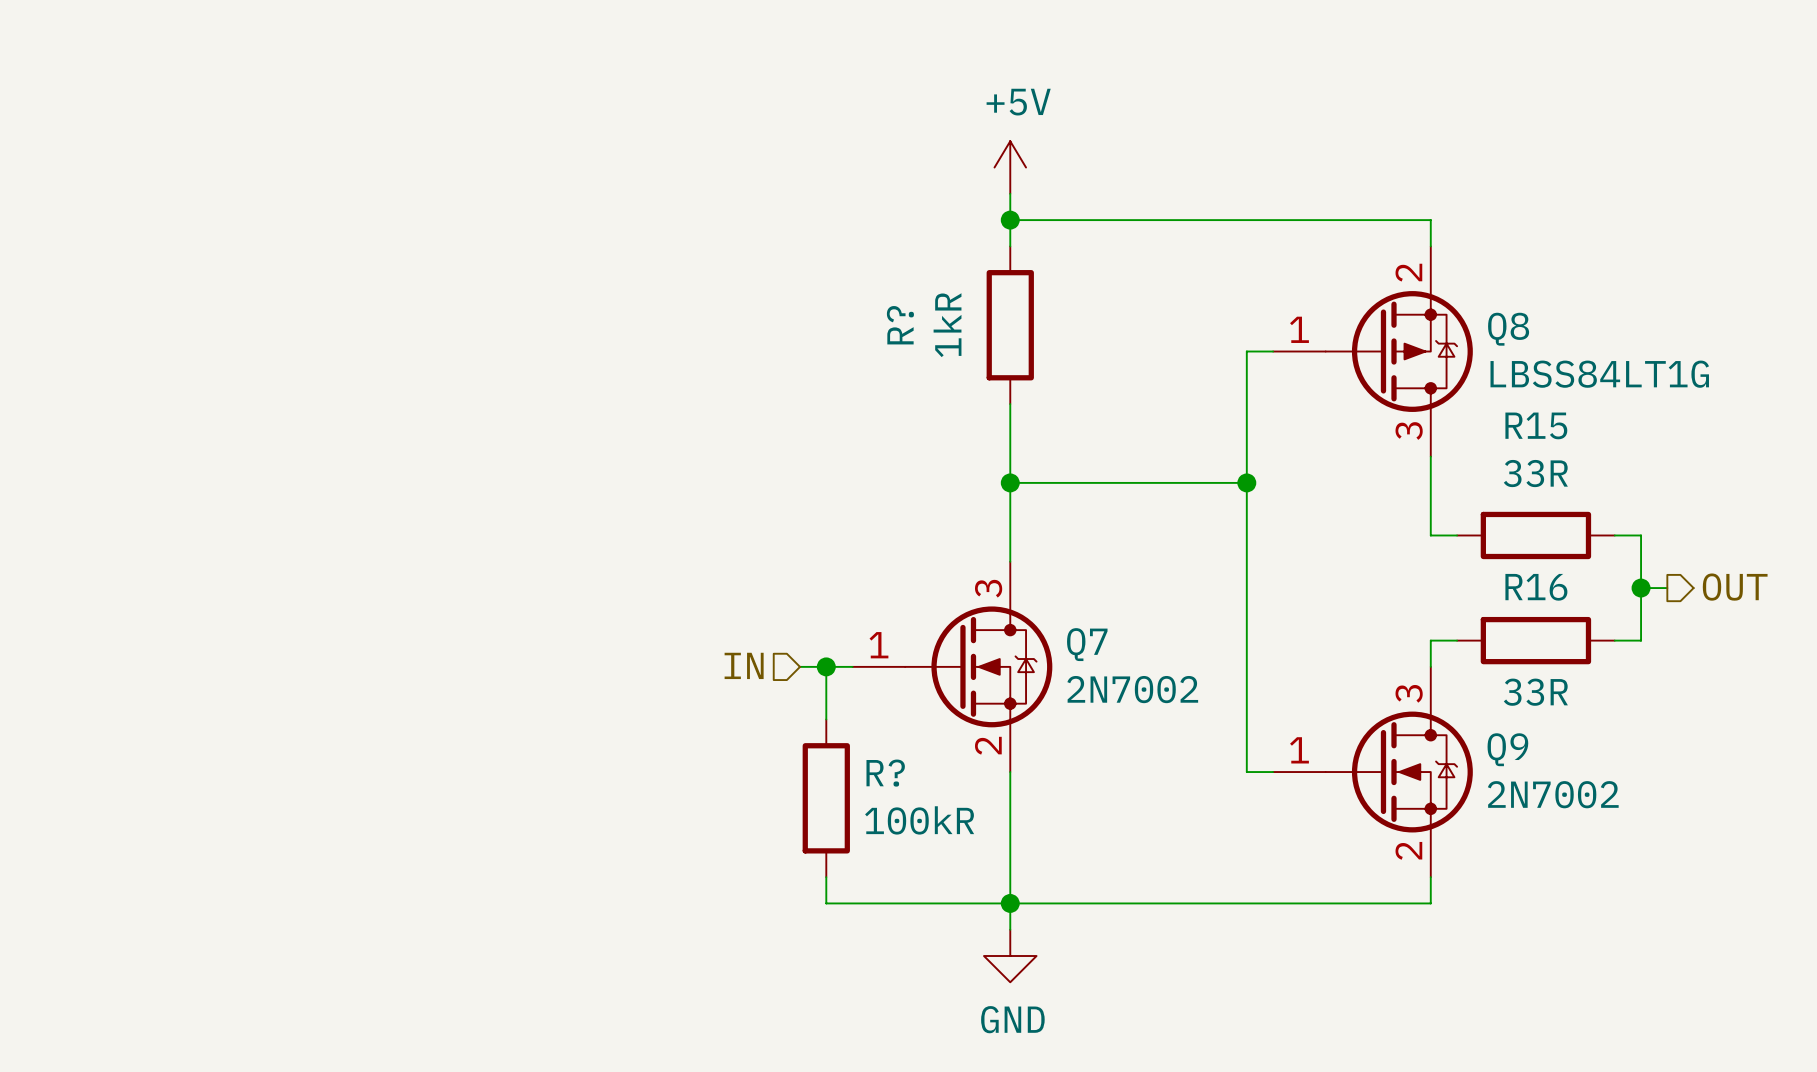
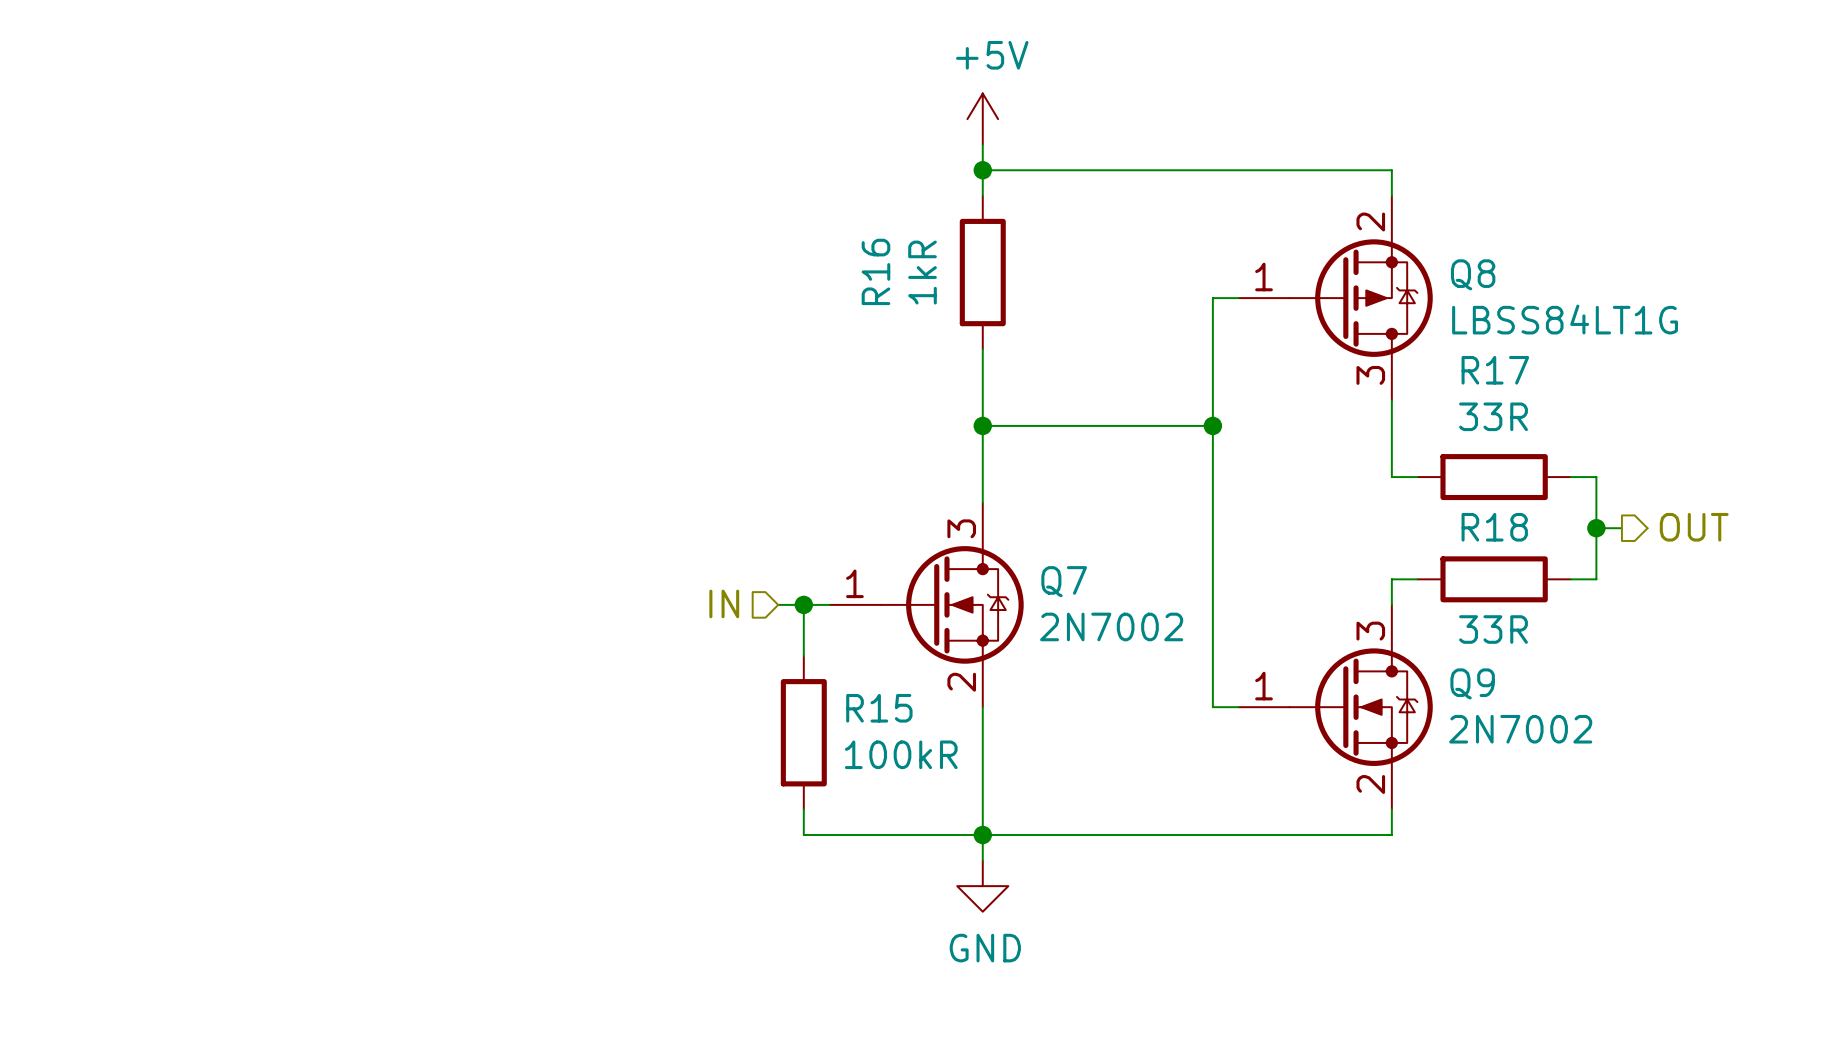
R? name: R? (900, 325) -> R16 (875, 271)
R15 name: R15 (1536, 425) -> R17 (1495, 370)
R16 name: R16 (1536, 587) -> R18 (1494, 527)
R? name: R? (885, 773) -> R15 (879, 708)

